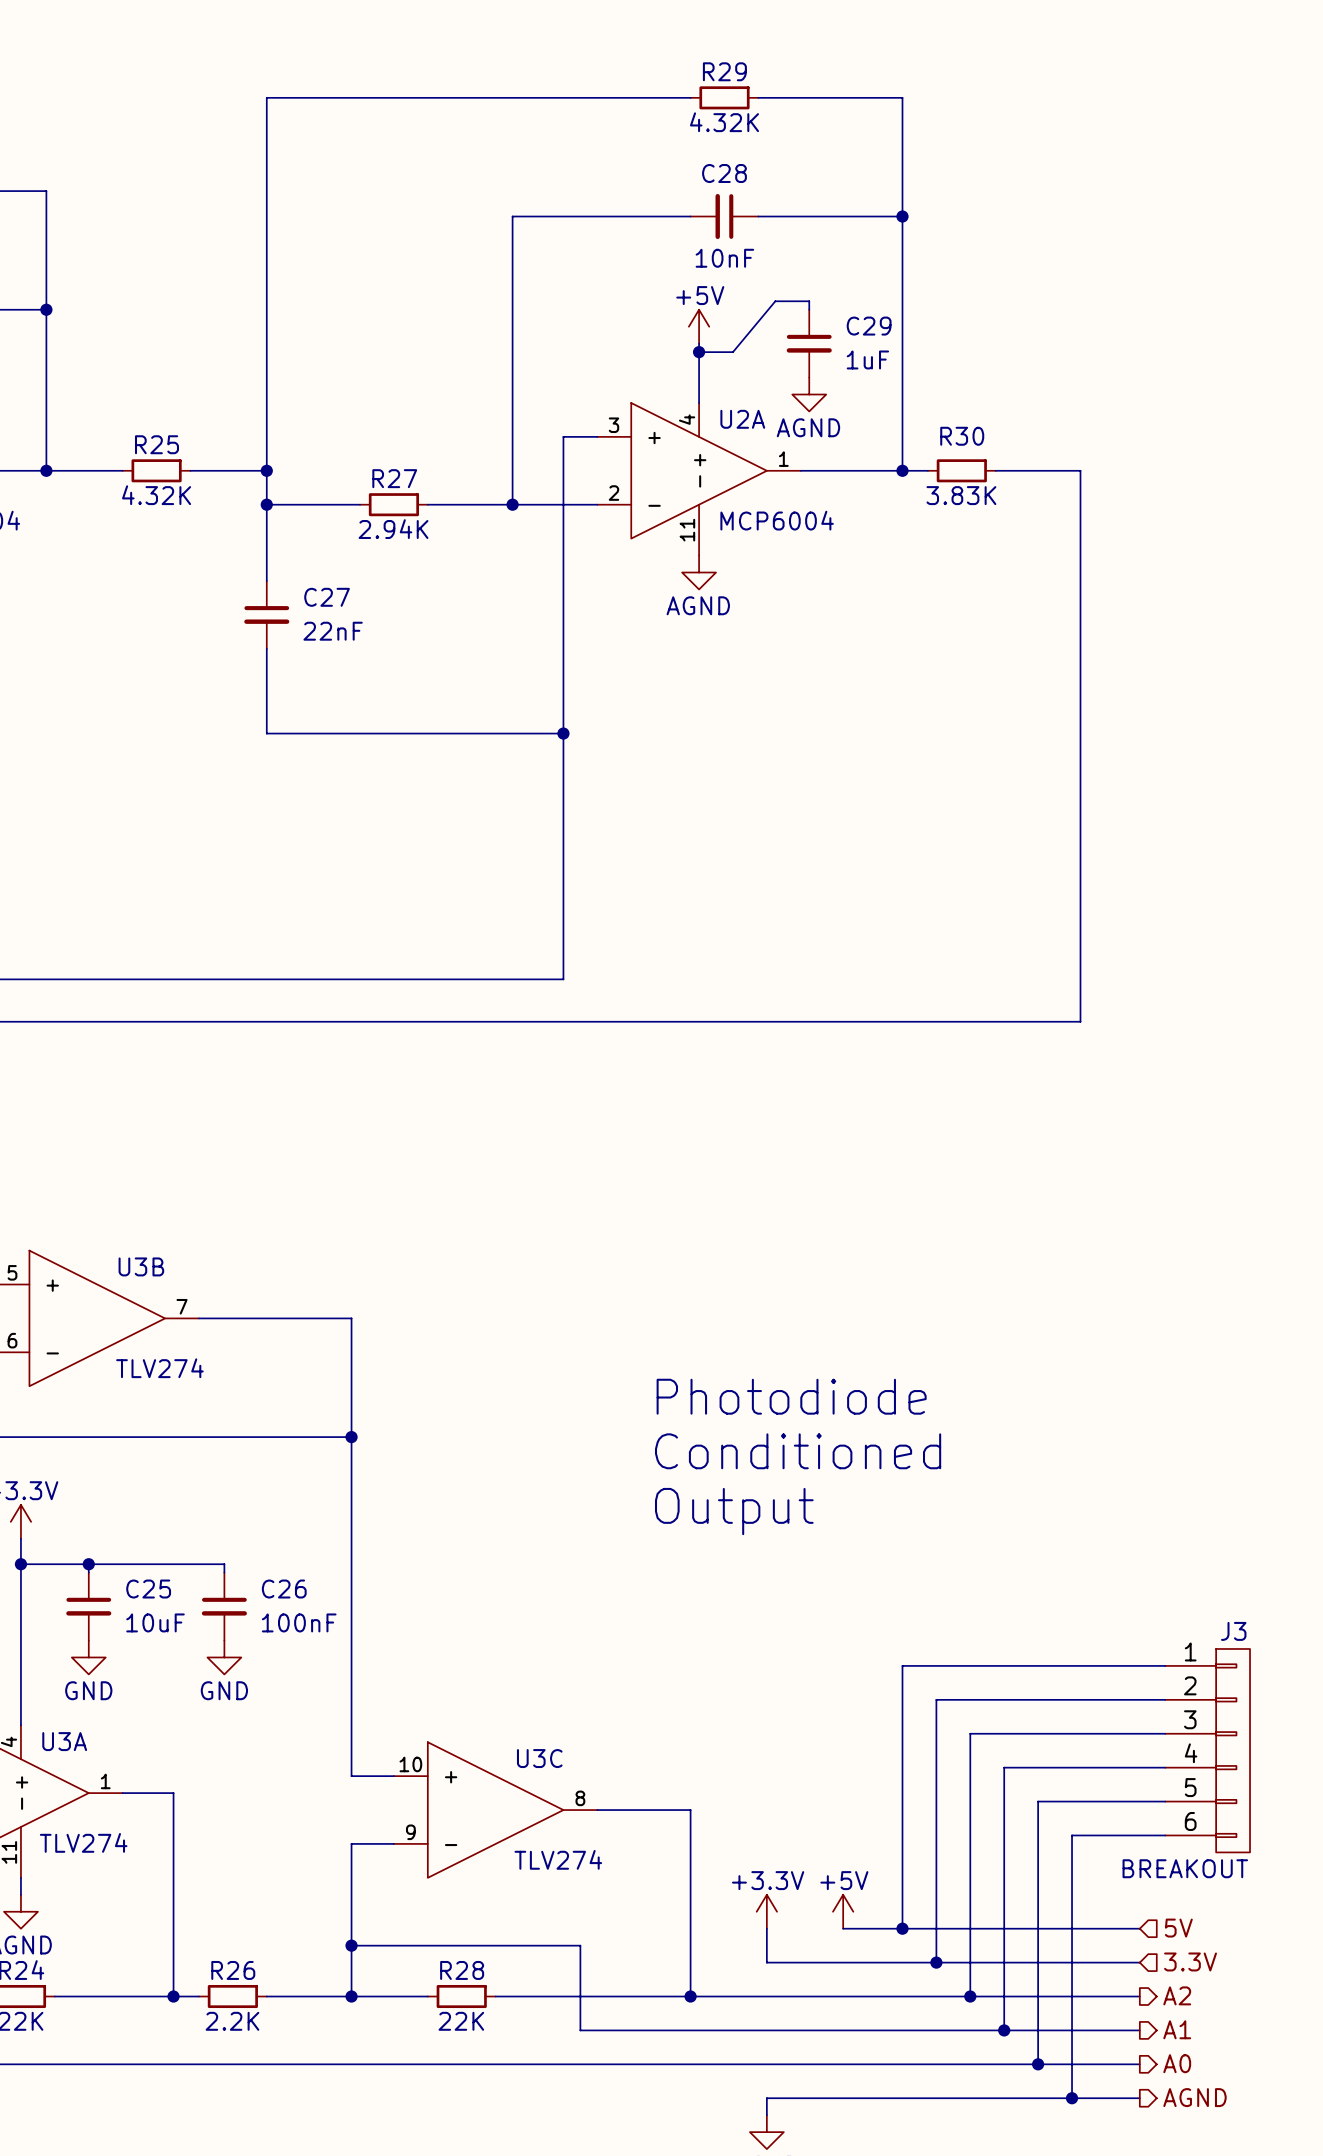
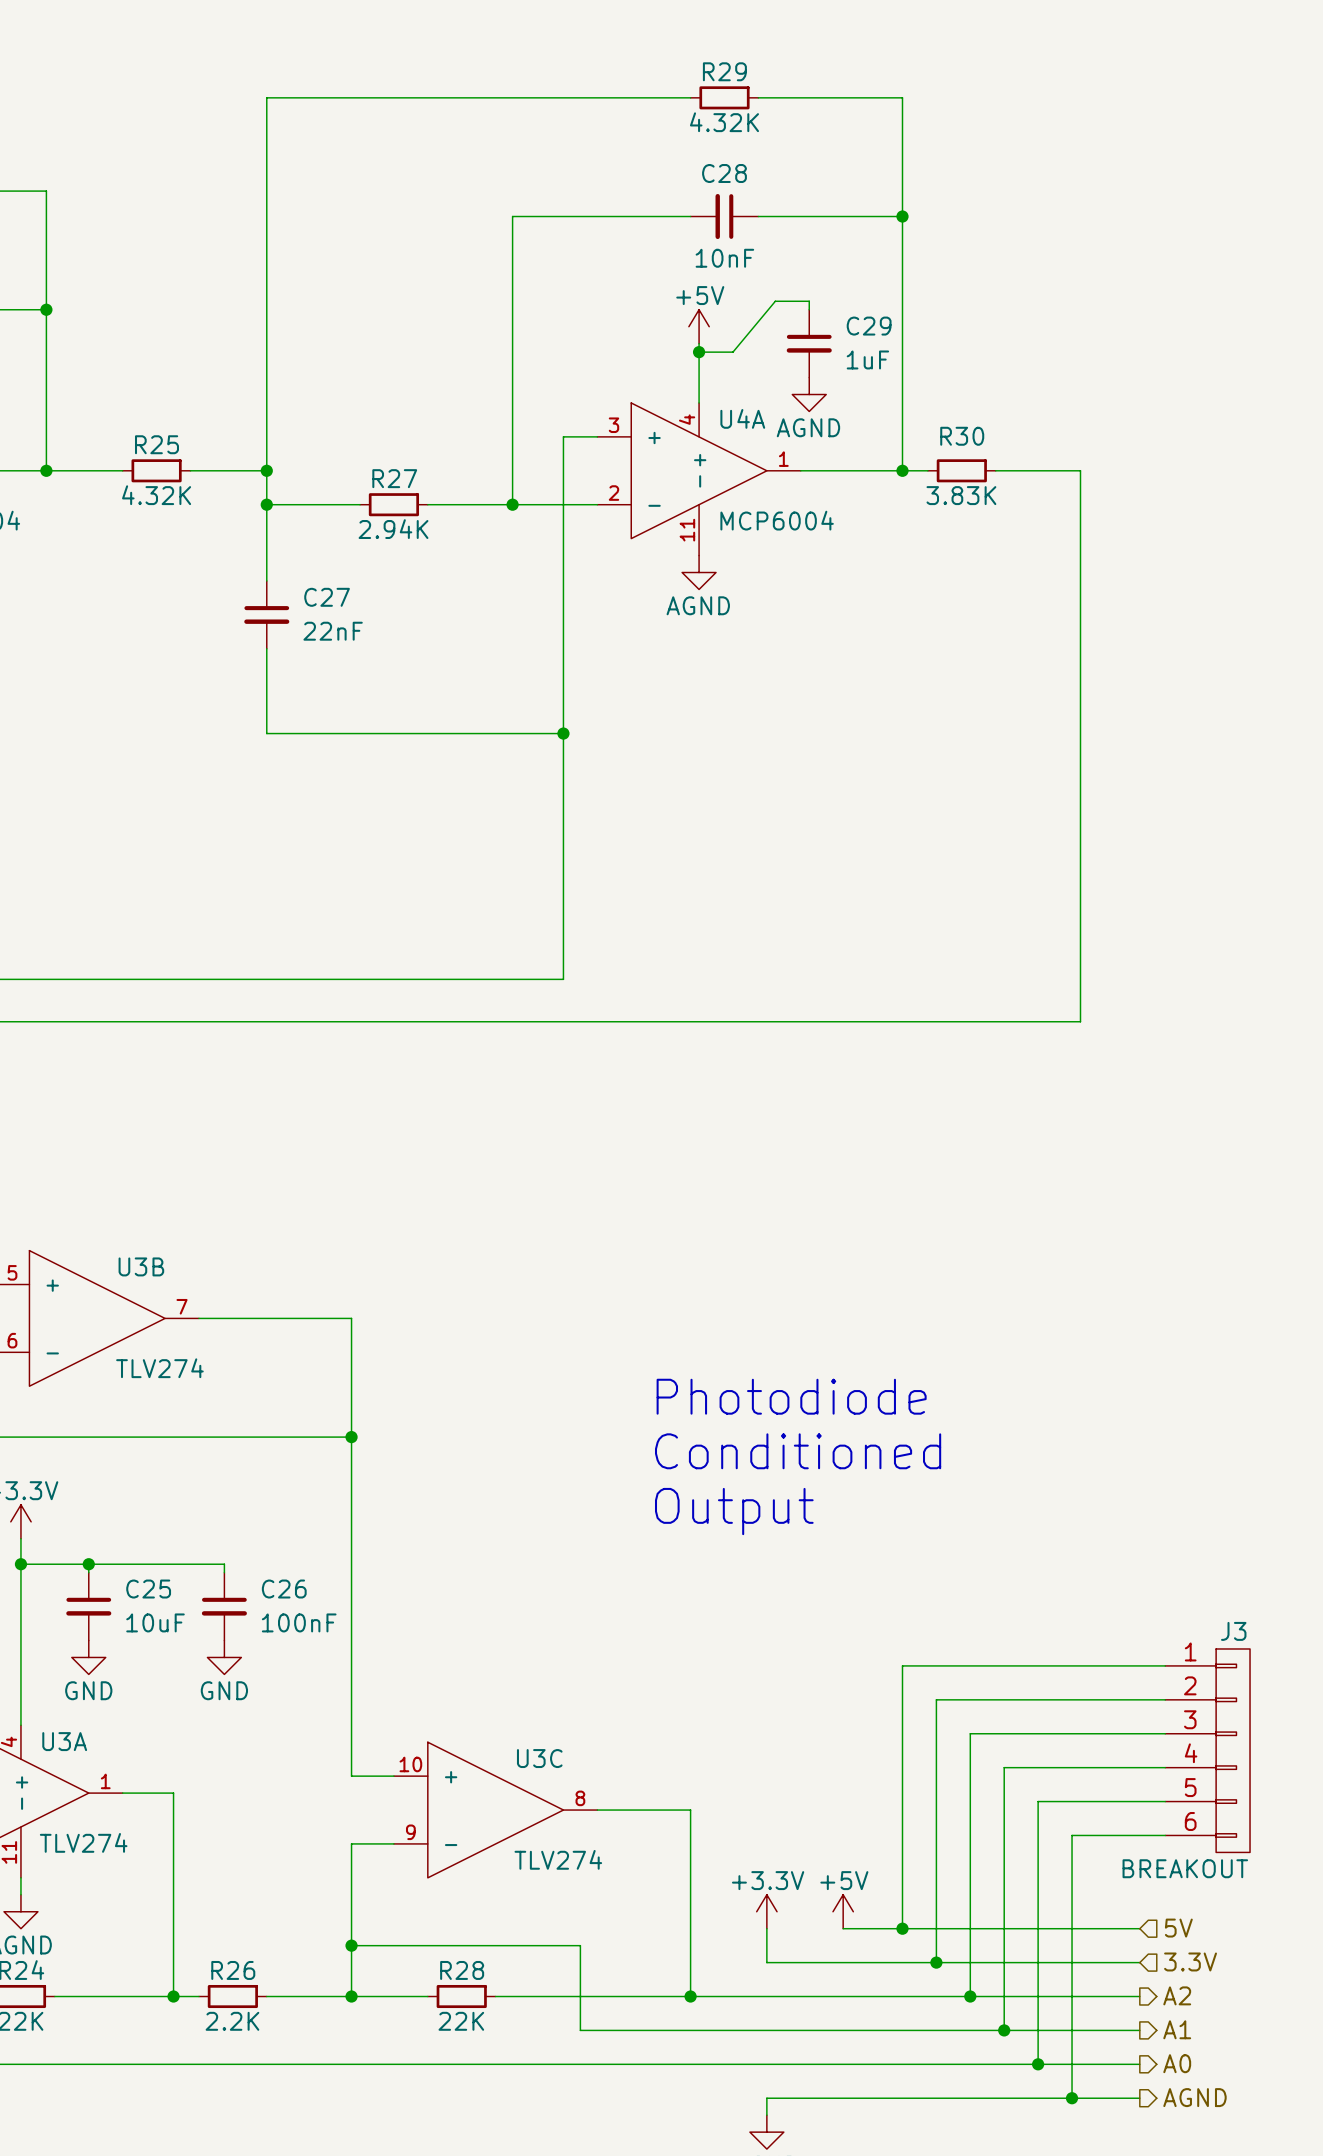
U2A name: U2A (742, 419) -> U4A (742, 418)

